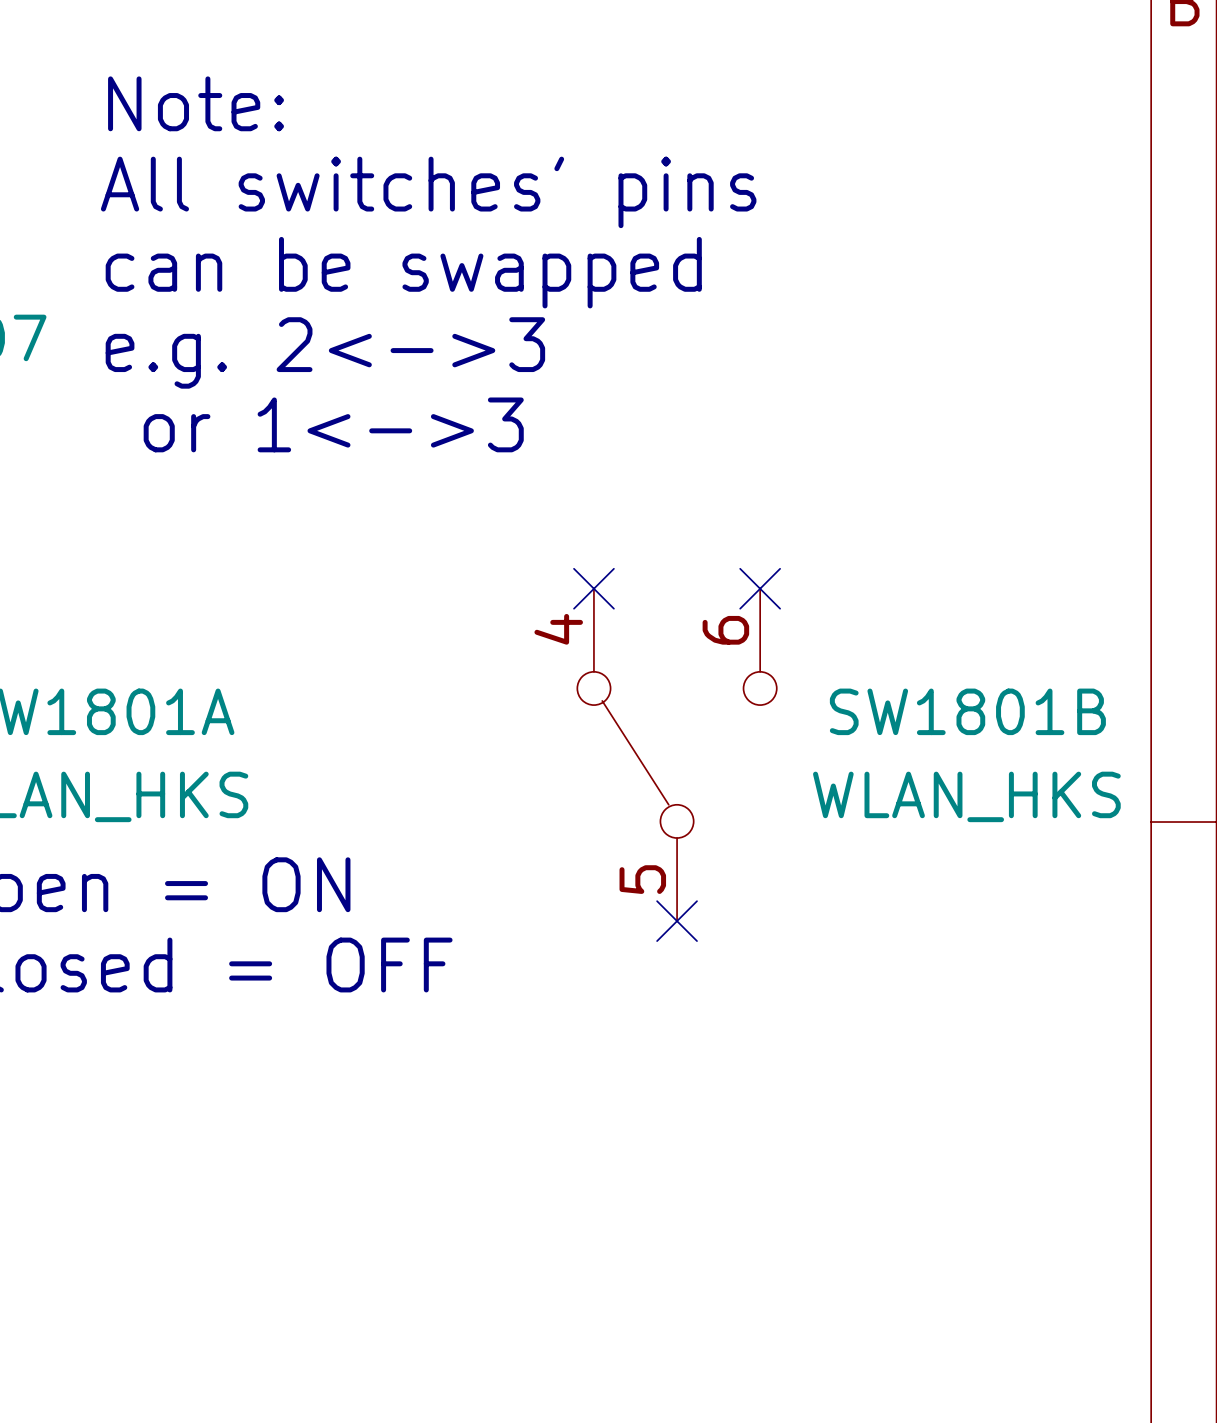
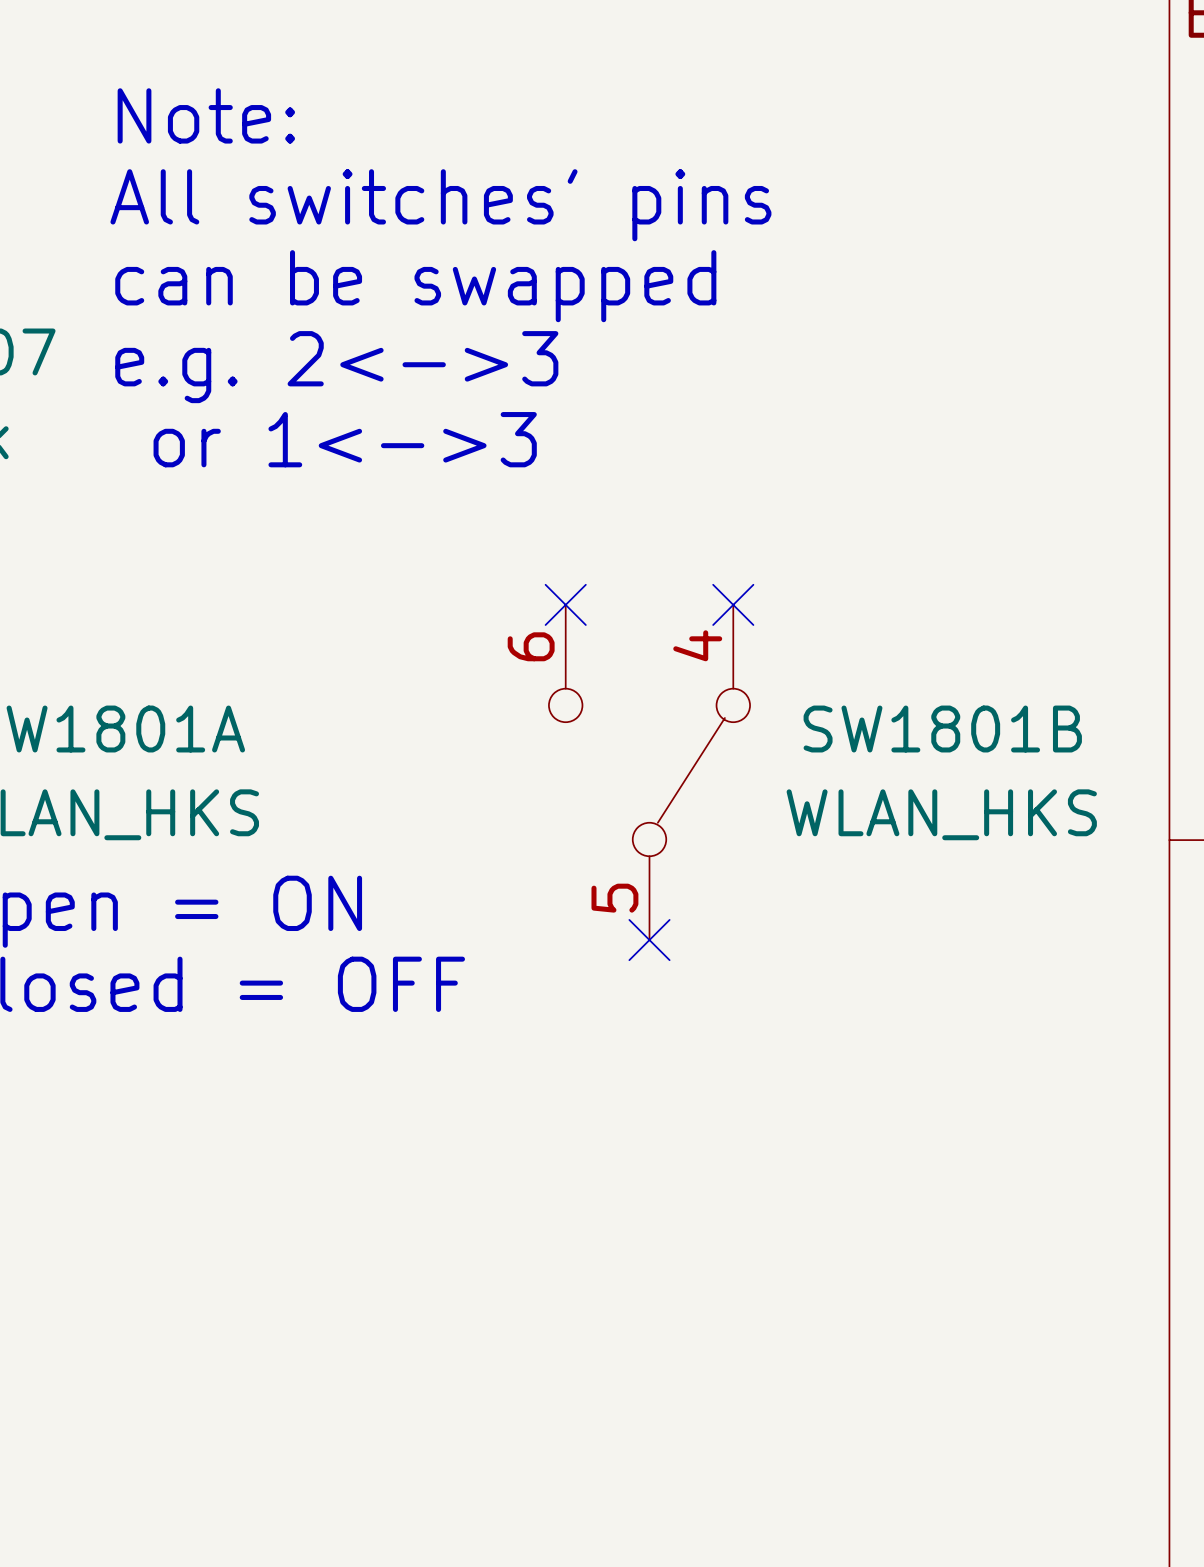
no-connect mark position: (593, 588) -> (565, 604)
no-connect mark position: (760, 588) -> (733, 604)
SW1801B flip: as is (677, 754) -> left-right (649, 772)
no-connect mark position: (677, 921) -> (649, 940)

